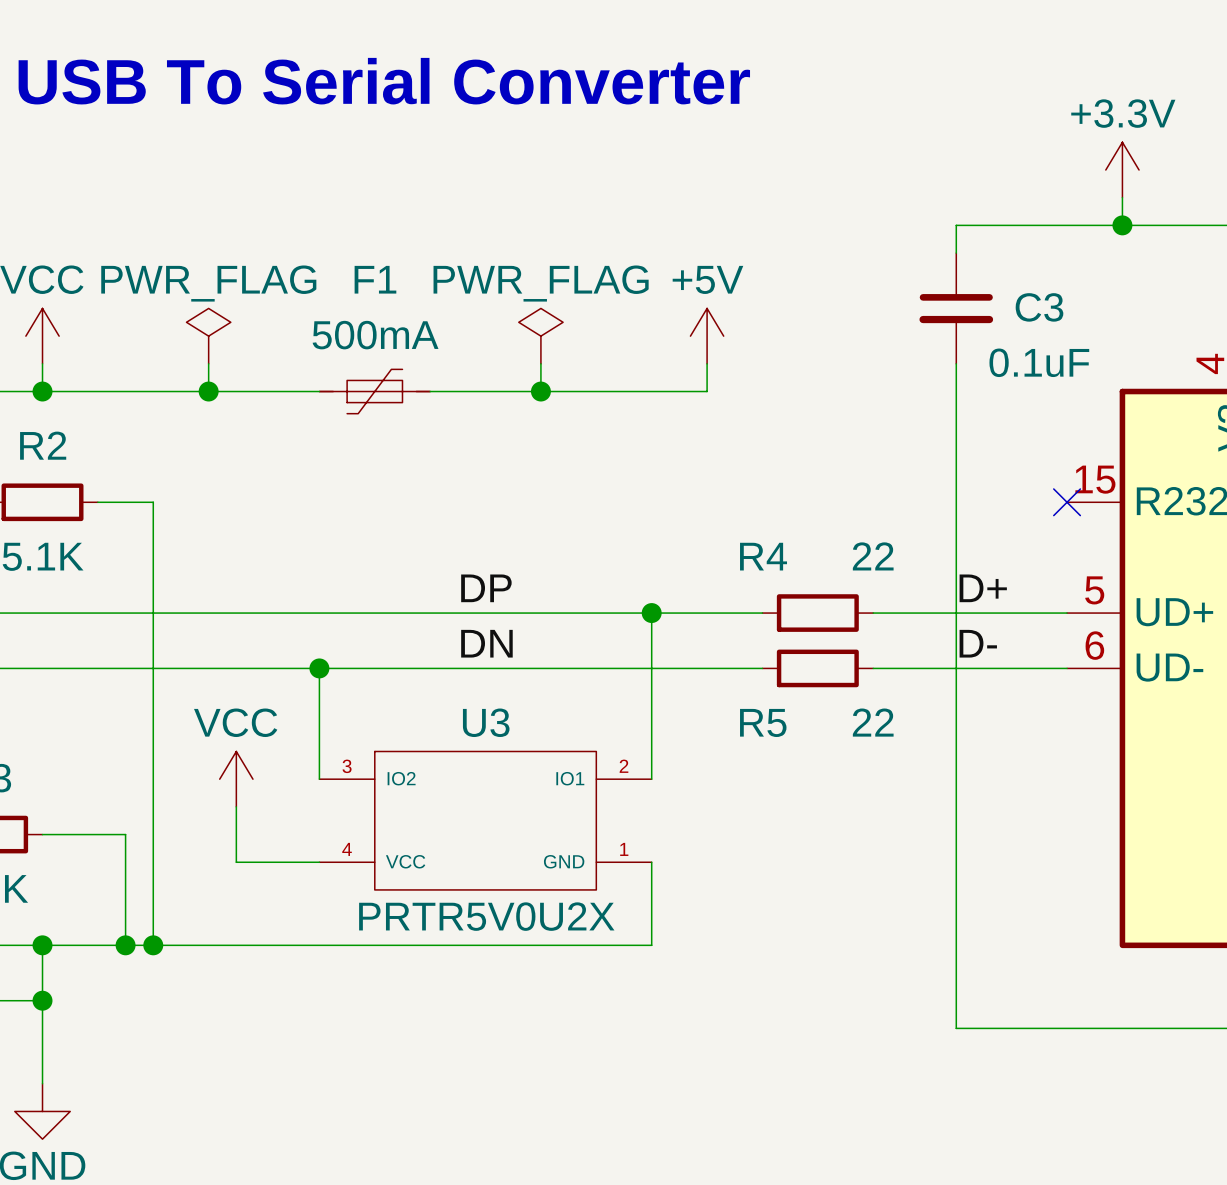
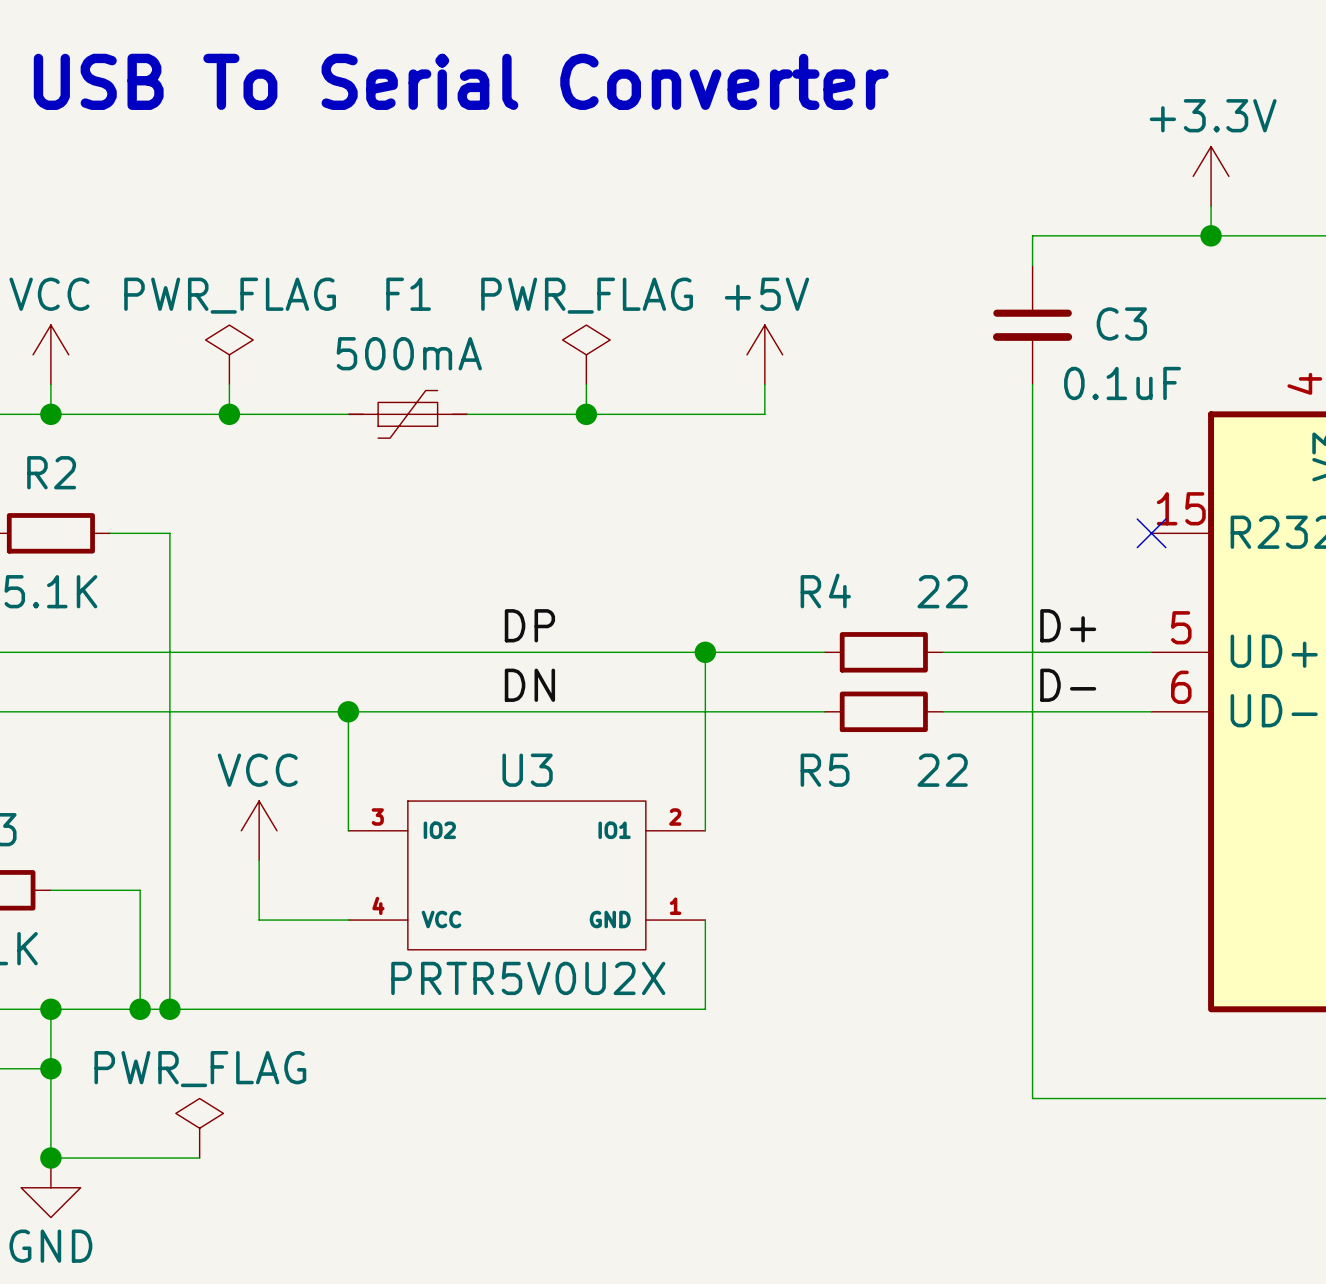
power symbol: none -> PWR_FLAG (199, 1128)
wire: none -> (50, 1158) (199, 1158)
junction: none -> (50, 1158)

